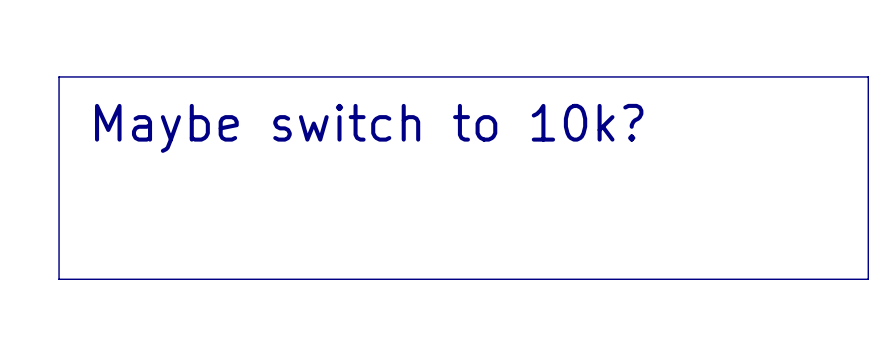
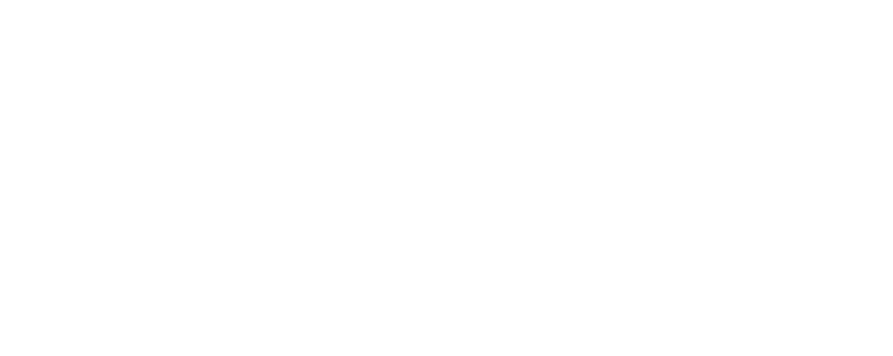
line: (59, 76) (868, 76) (868, 279) (59, 279) (59, 76) -> none
text: Maybe switch to 10k? (369, 128) -> none

